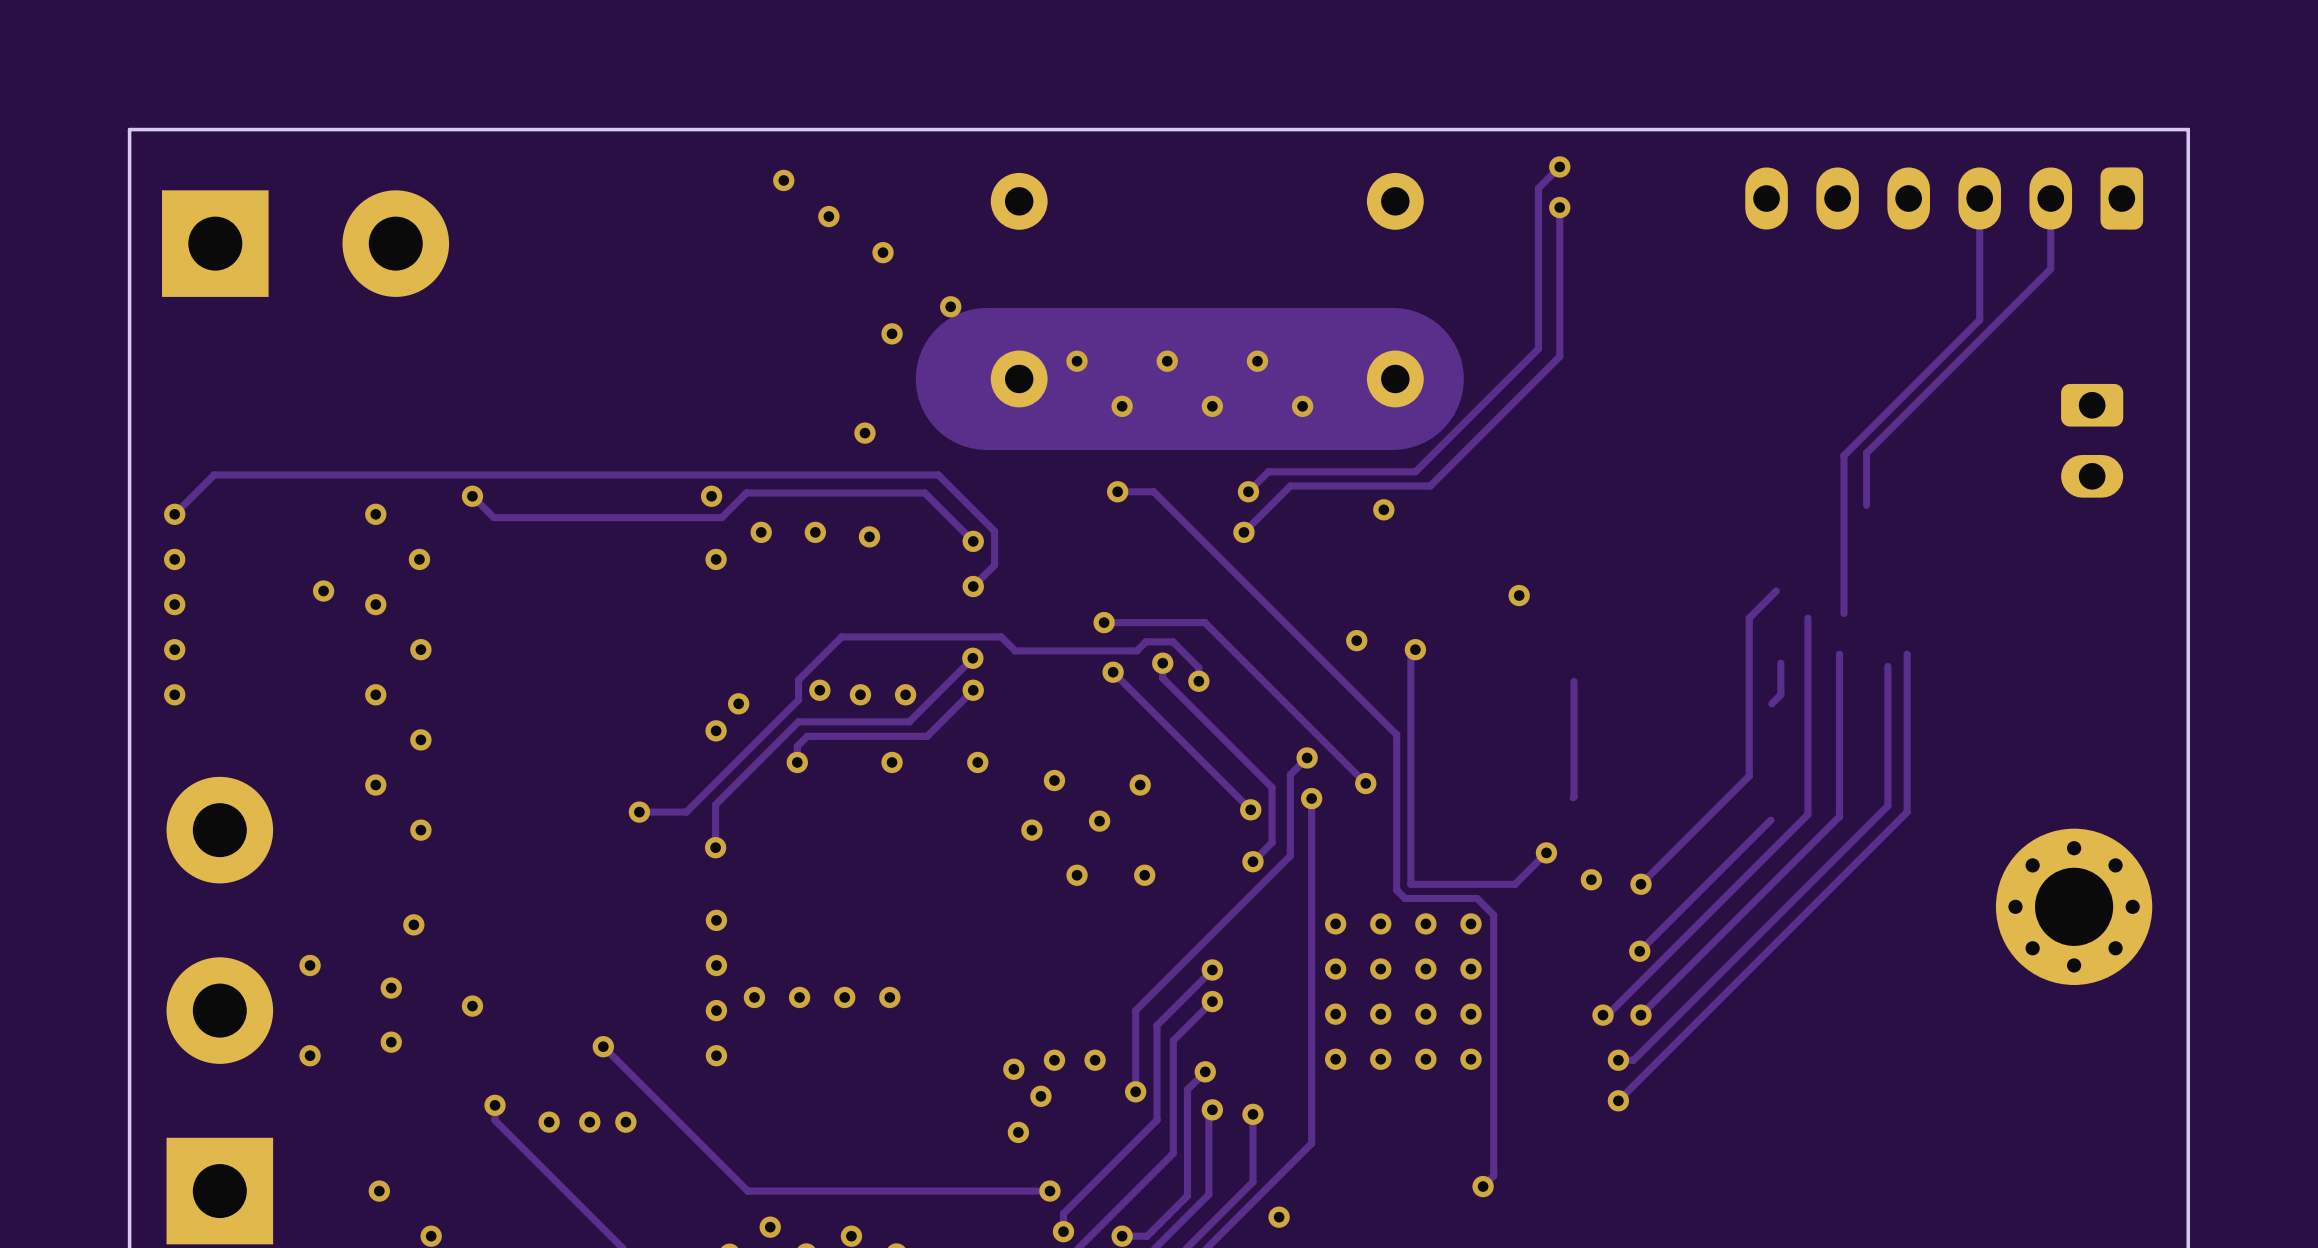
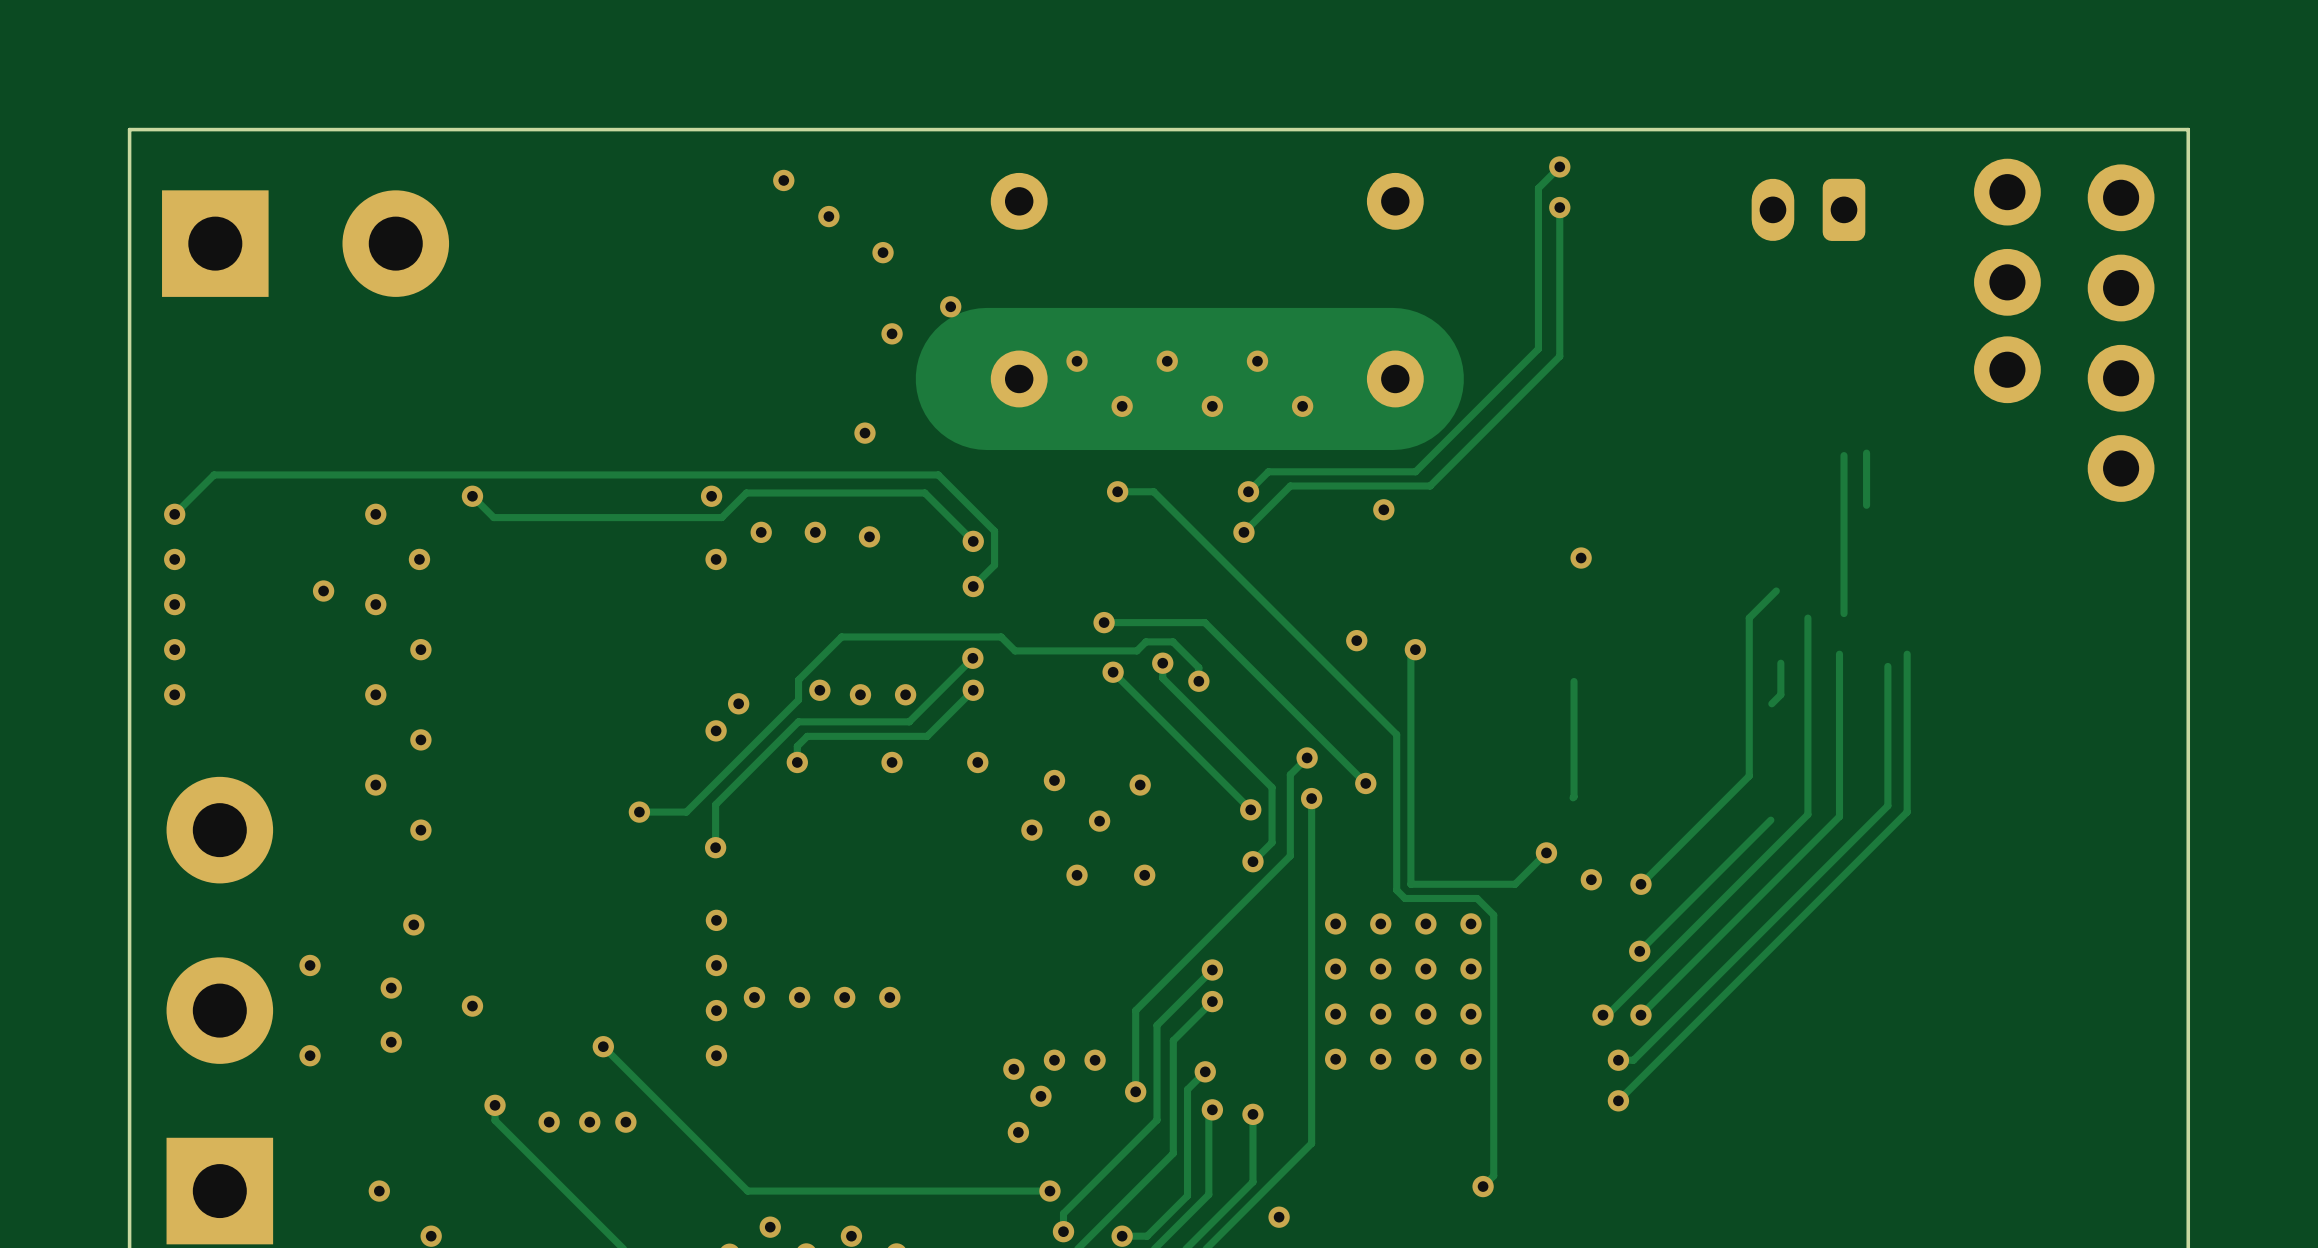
part: (1944, 198) -> none
track: (1979, 198) (1979, 319) (1844, 455) -> none
track: (2050, 198) (2050, 268) (1866, 453) -> none
part: none -> (2007, 237)
part: none -> (2121, 333)
part: none -> (2007, 369)
part rotation: 0° (2092, 440) -> 90° clockwise (1808, 209)
part position: (2092, 440) -> (1808, 209)
via position: (1519, 595) -> (1581, 558)
part: (2074, 906) -> none

